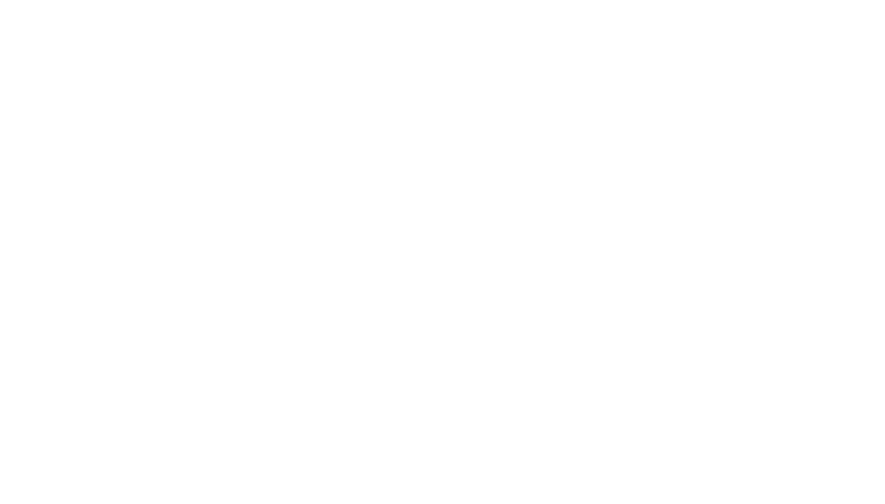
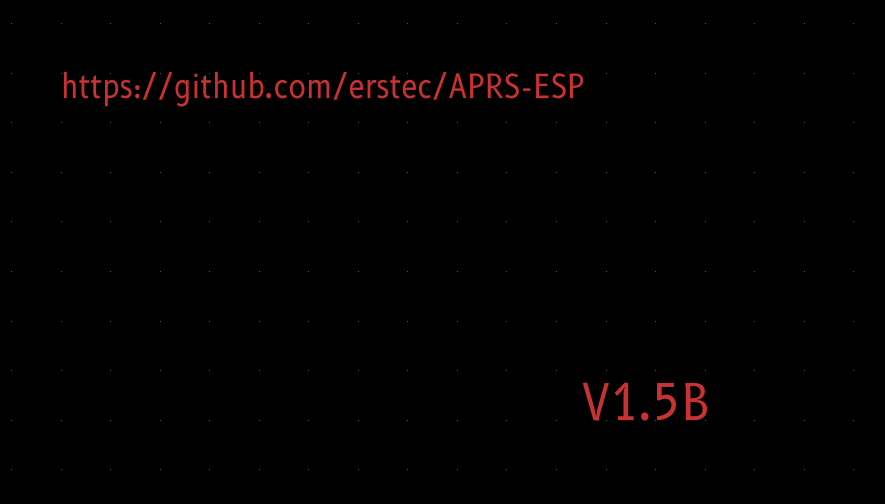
text: none -> https://github.com/erstec/APRS-ESP (323, 89)
text: none -> V1.5B (644, 401)

